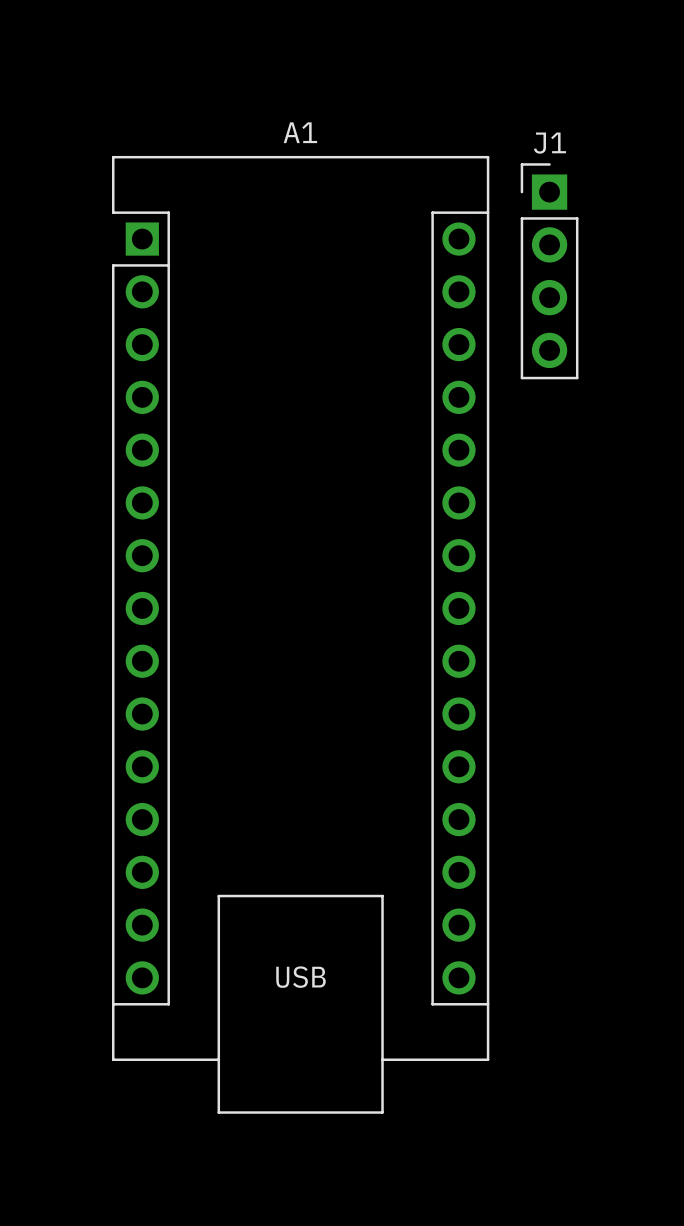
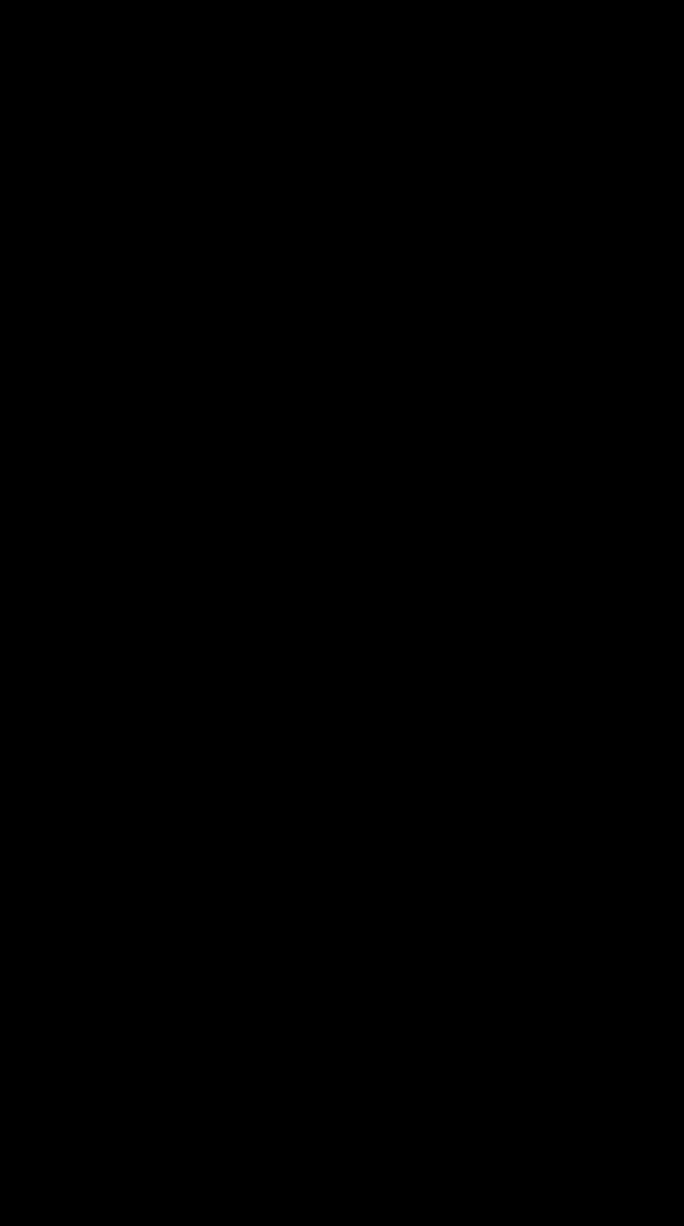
J1: (549, 271) -> none
A1: (300, 634) -> none

